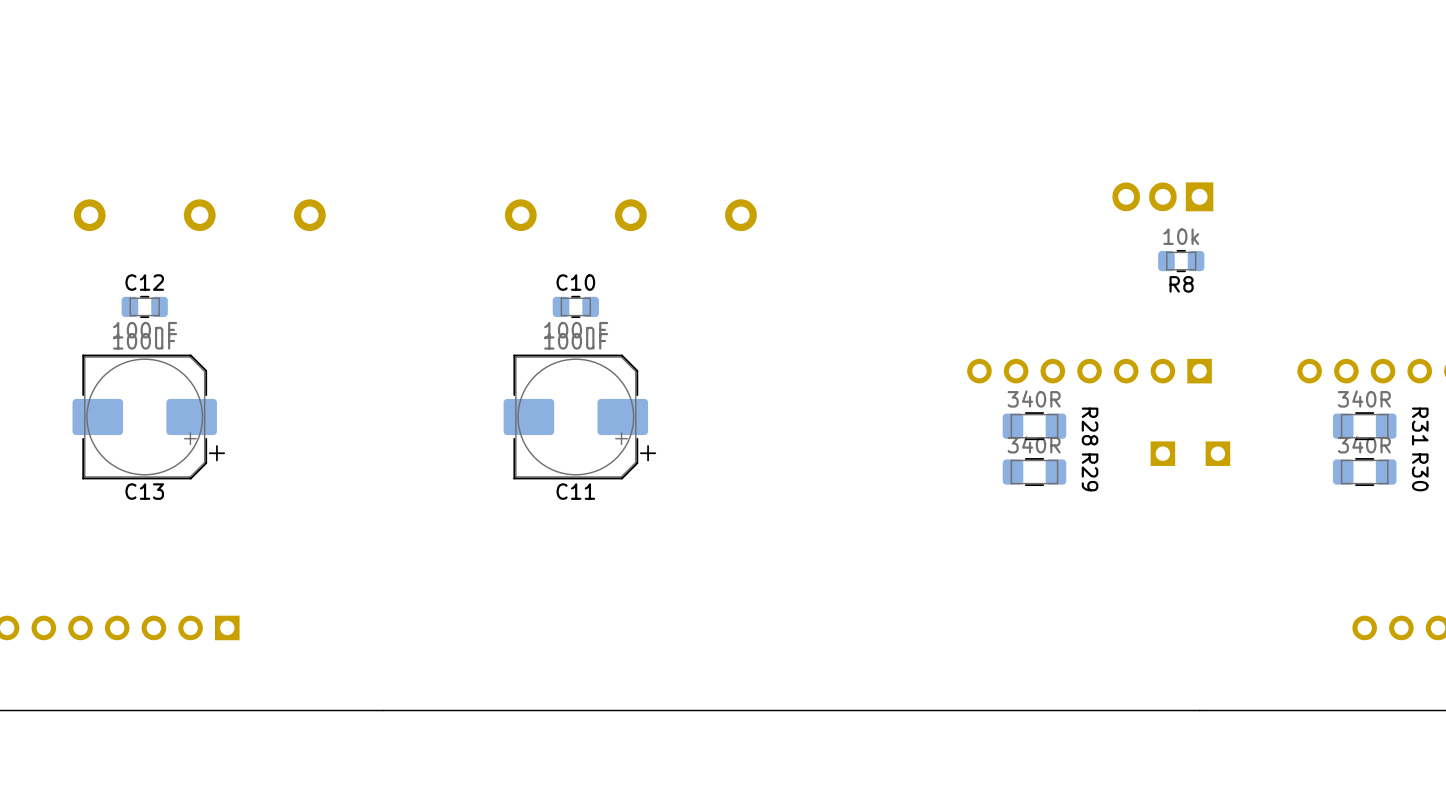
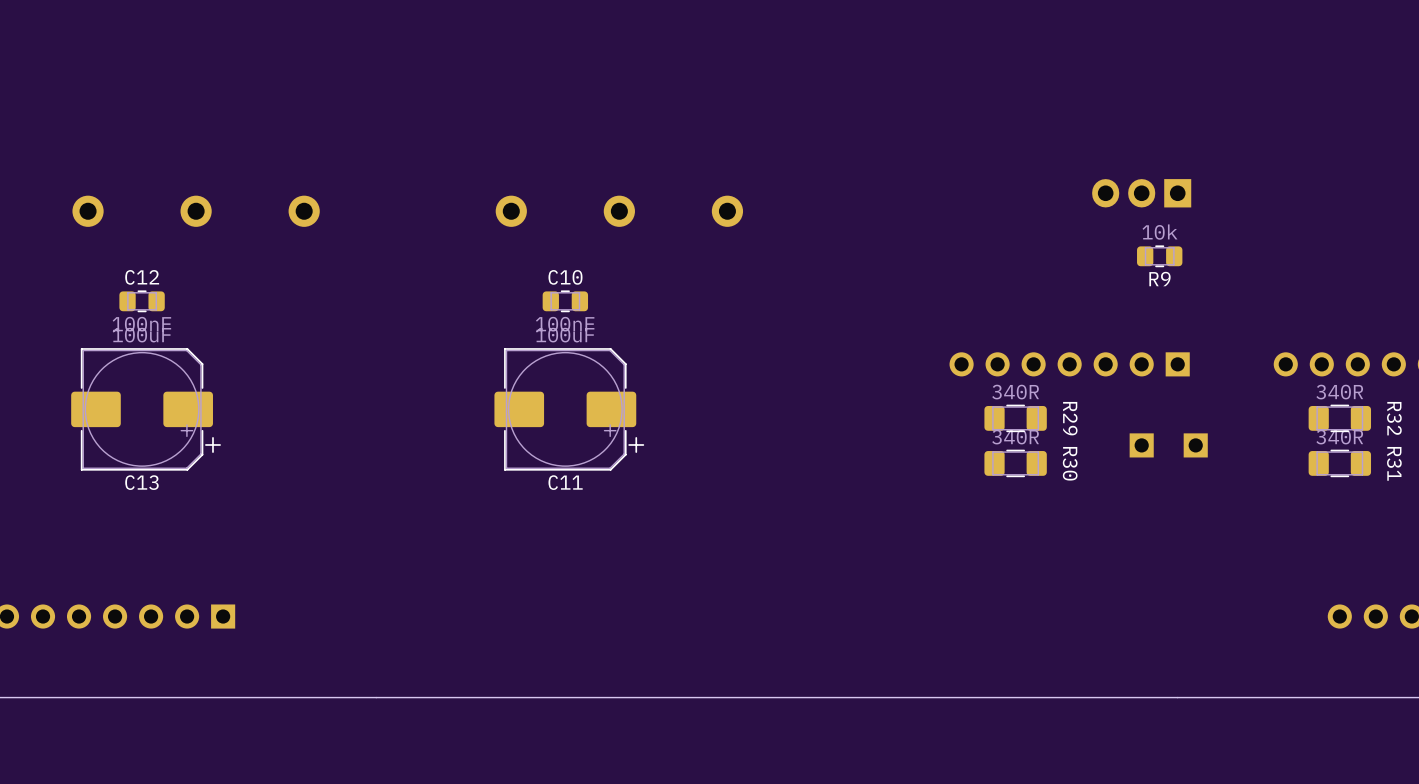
R8 name: R8 (1181, 284) -> R9 (1159, 279)
R28 name: R28 (1090, 426) -> R29 (1070, 418)
R31 name: R31 (1420, 426) -> R32 (1394, 418)
R29 name: R29 (1090, 472) -> R30 (1070, 463)
R30 name: R30 (1420, 472) -> R31 (1394, 463)

